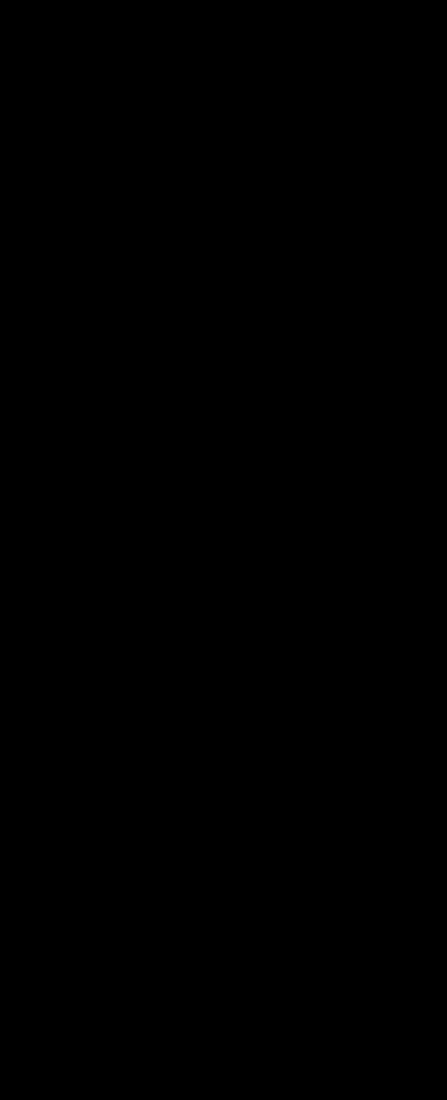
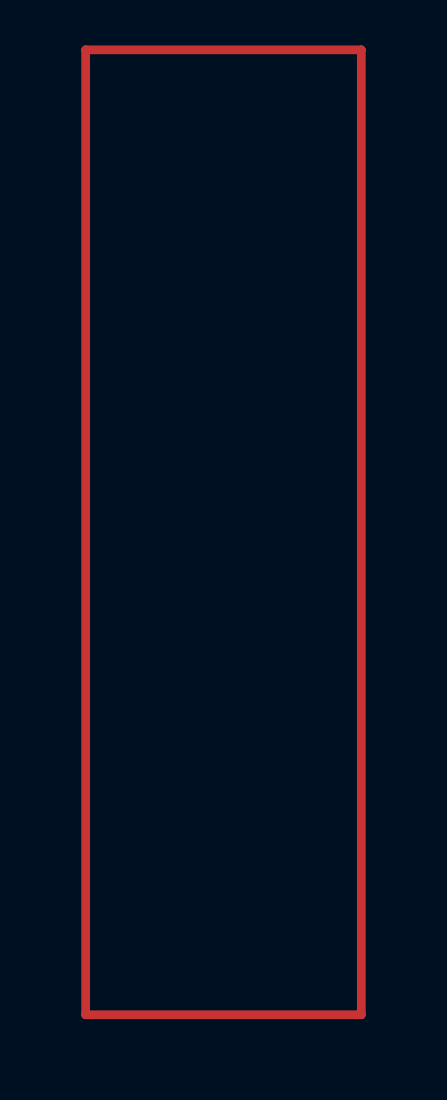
track: none -> (85, 49) (361, 49) (361, 1014) (85, 1014) (85, 49)

